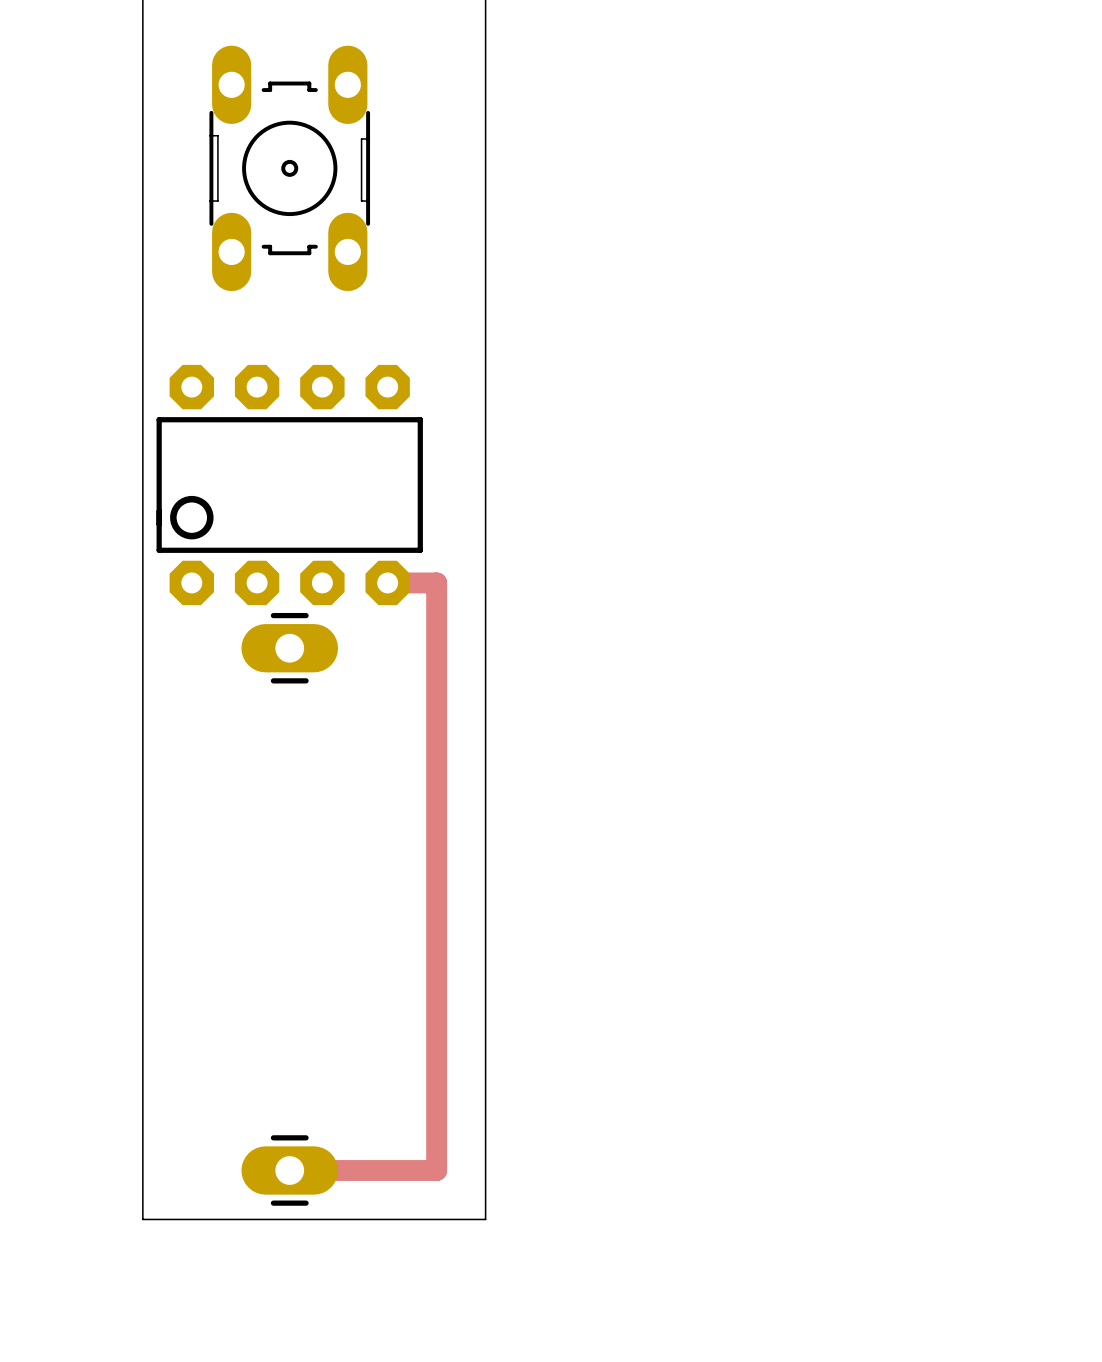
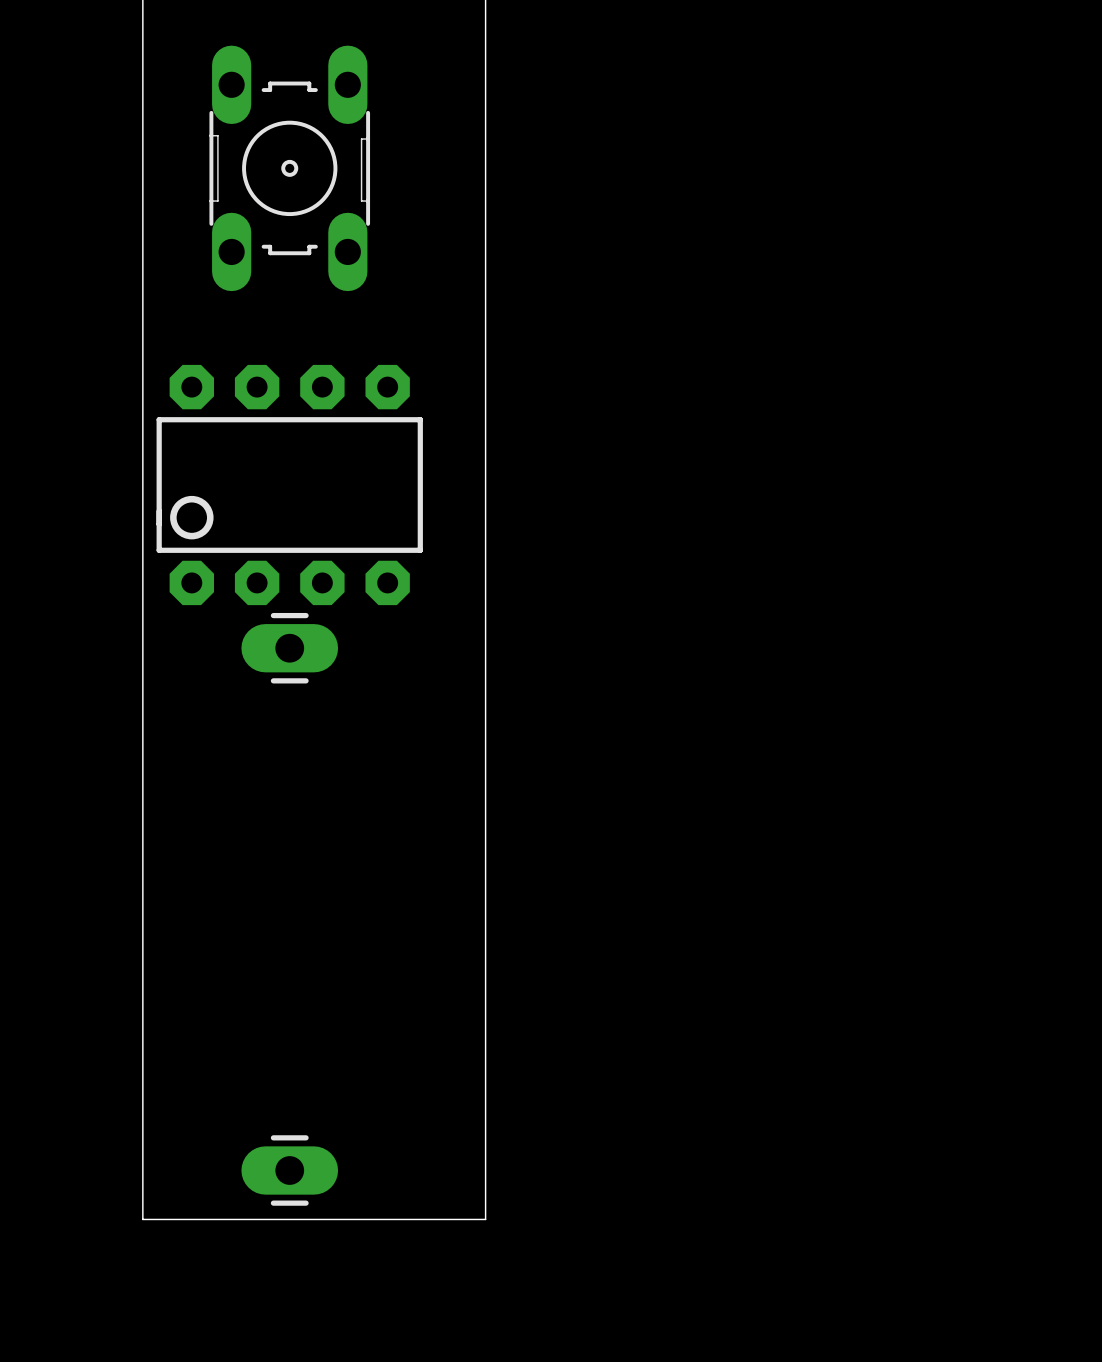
track: (387, 582) (436, 582) (436, 1170) (289, 1170) -> none

